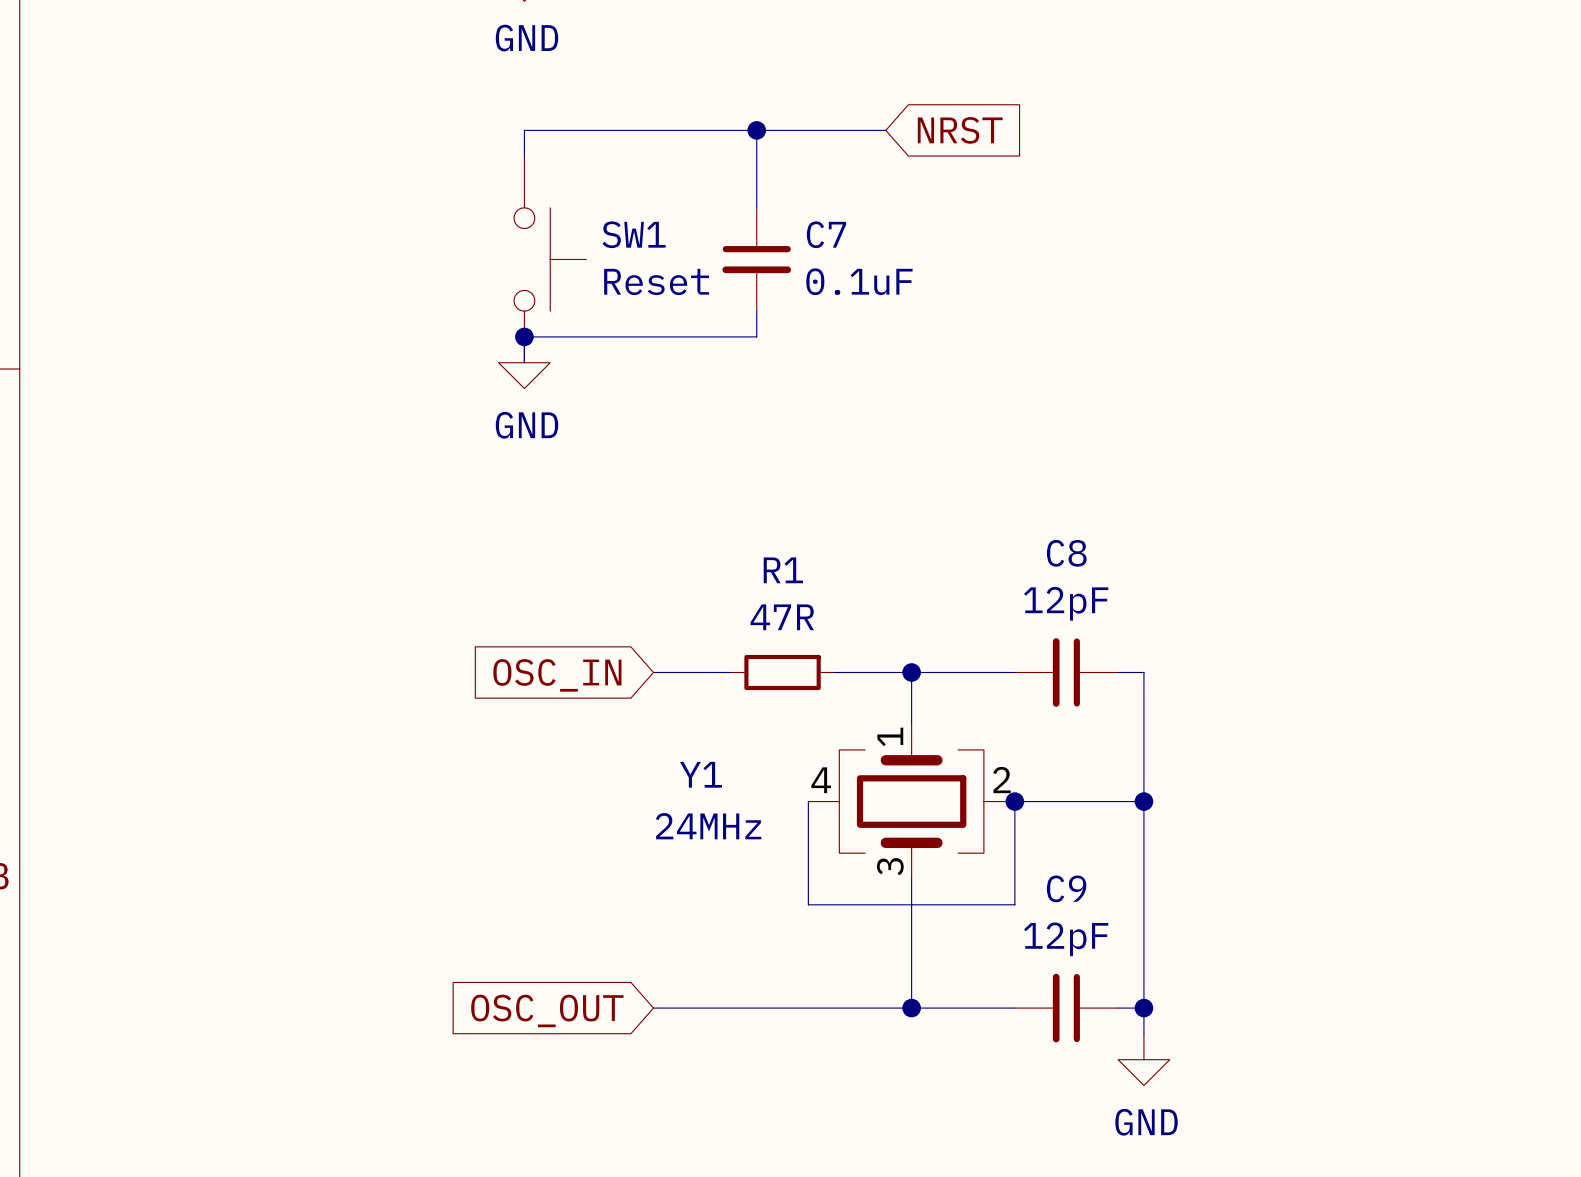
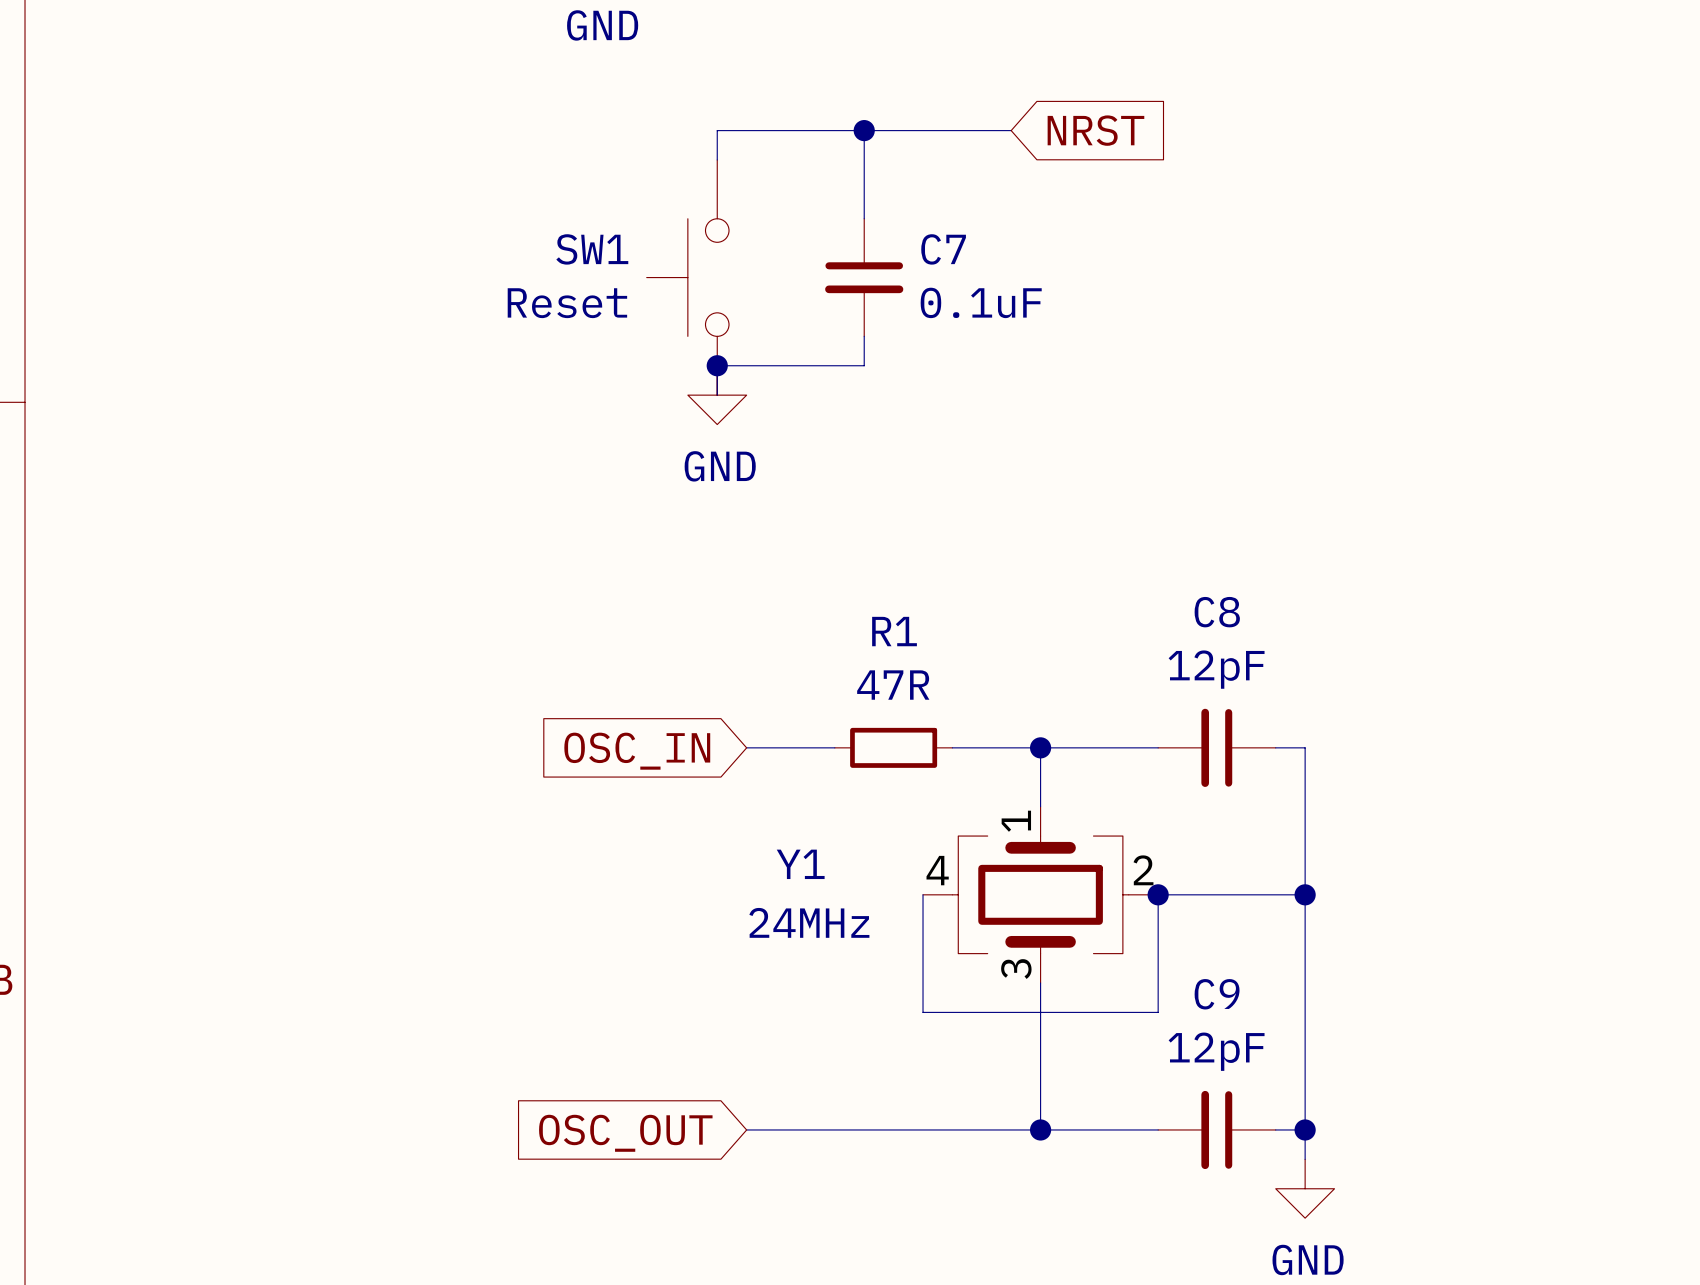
wire: (627, 130) (524, 130) (524, 156) -> (717, 130) (717, 159)
SW1 name position: SW1 (634, 234) -> SW1 (592, 249)
SW1 rotation: 0° (550, 259) -> 180° (687, 277)
SW1 value position: Reset (656, 281) -> Reset (567, 303)
junction position: (524, 336) -> (717, 365)
wire: (627, 336) (524, 336) (524, 362) -> (717, 365) (717, 395)
power symbol position: GND (524, 362) -> GND (717, 395)

